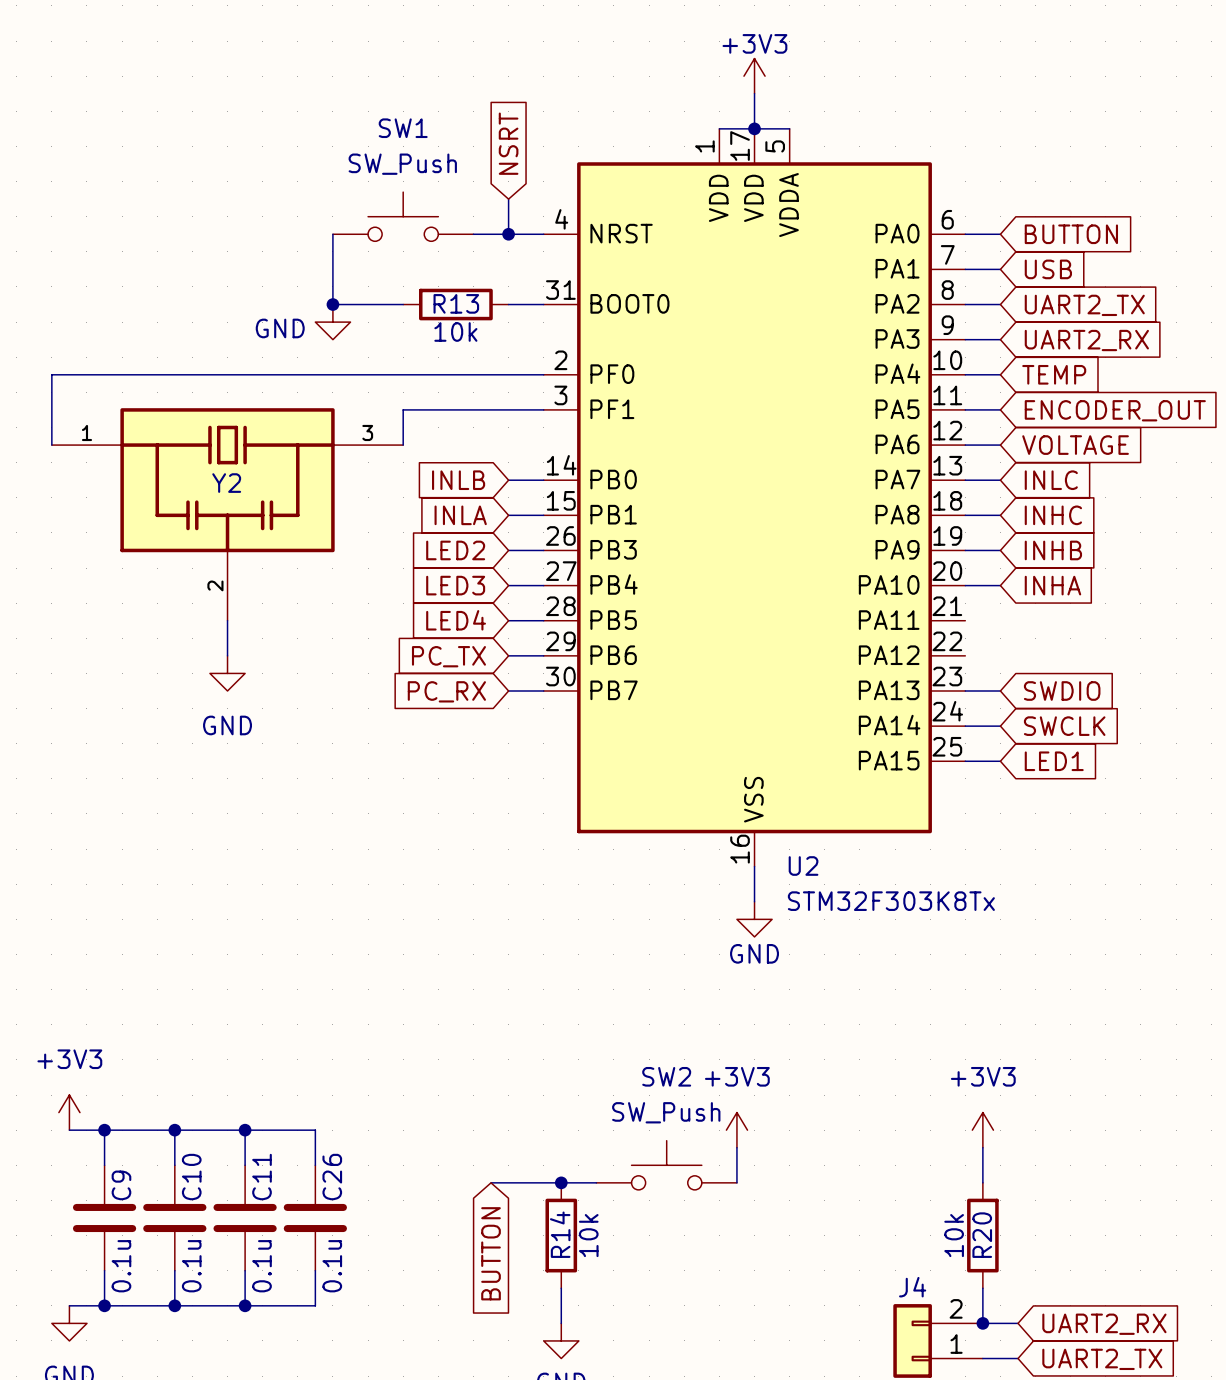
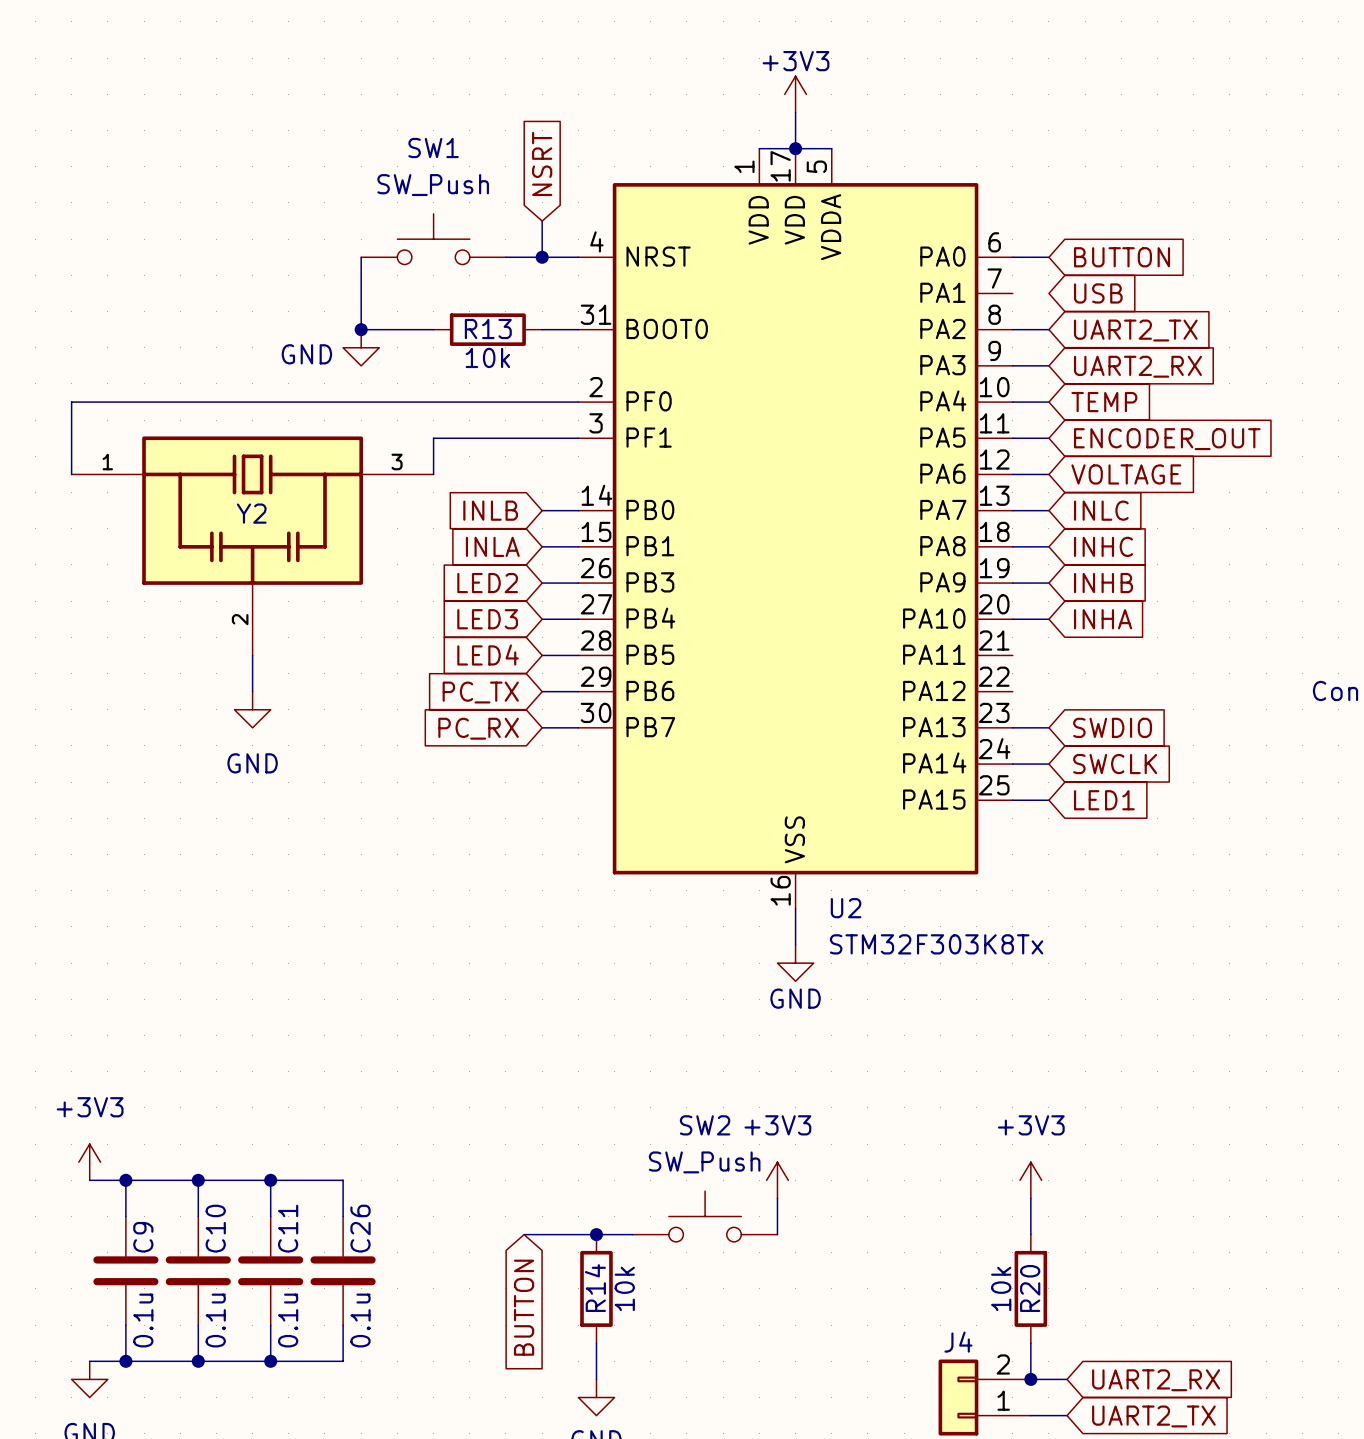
wire: (965, 269) (1000, 269) -> none

